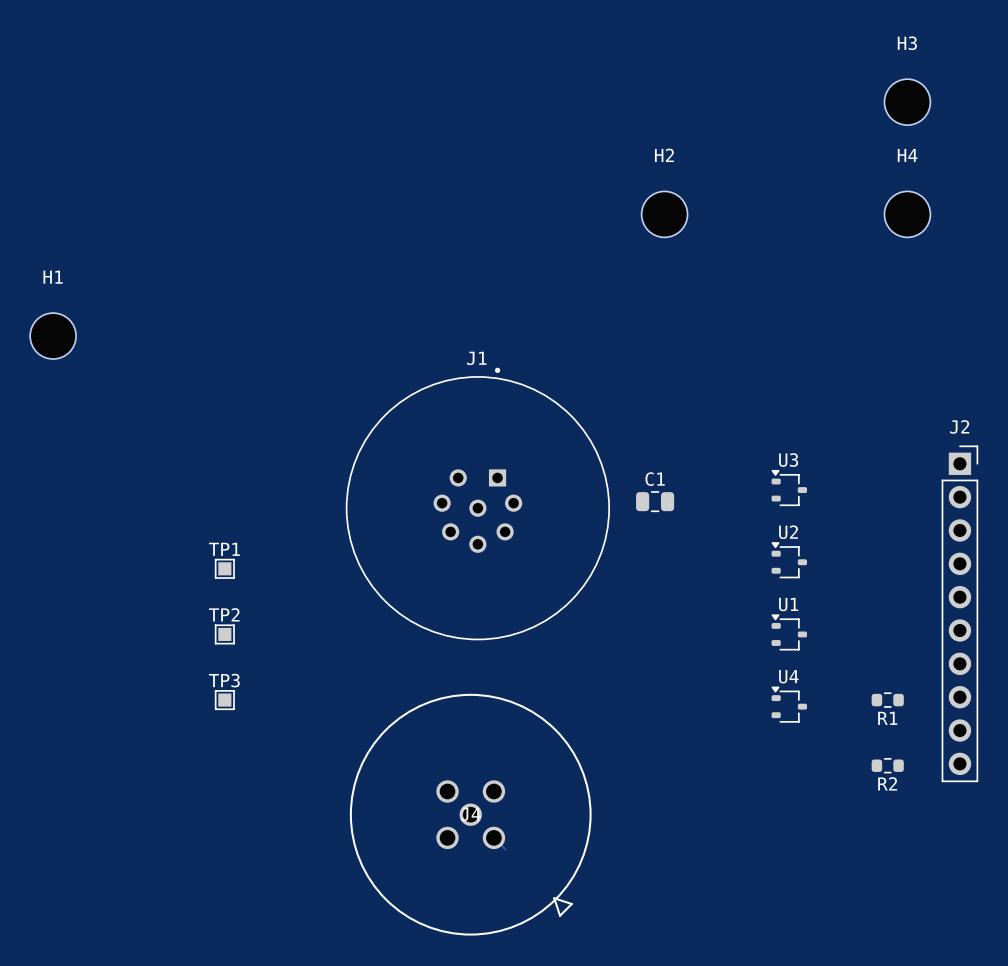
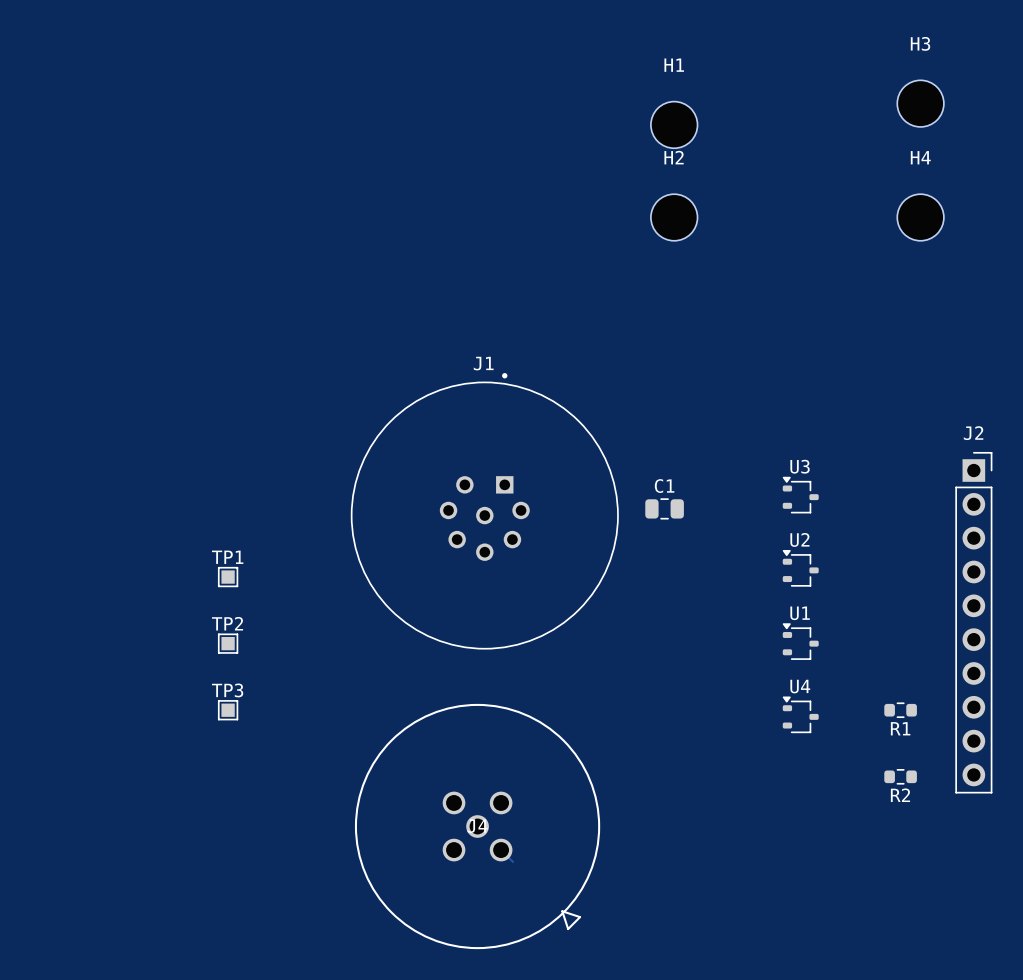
H1 position: (53, 336) -> (674, 124)

